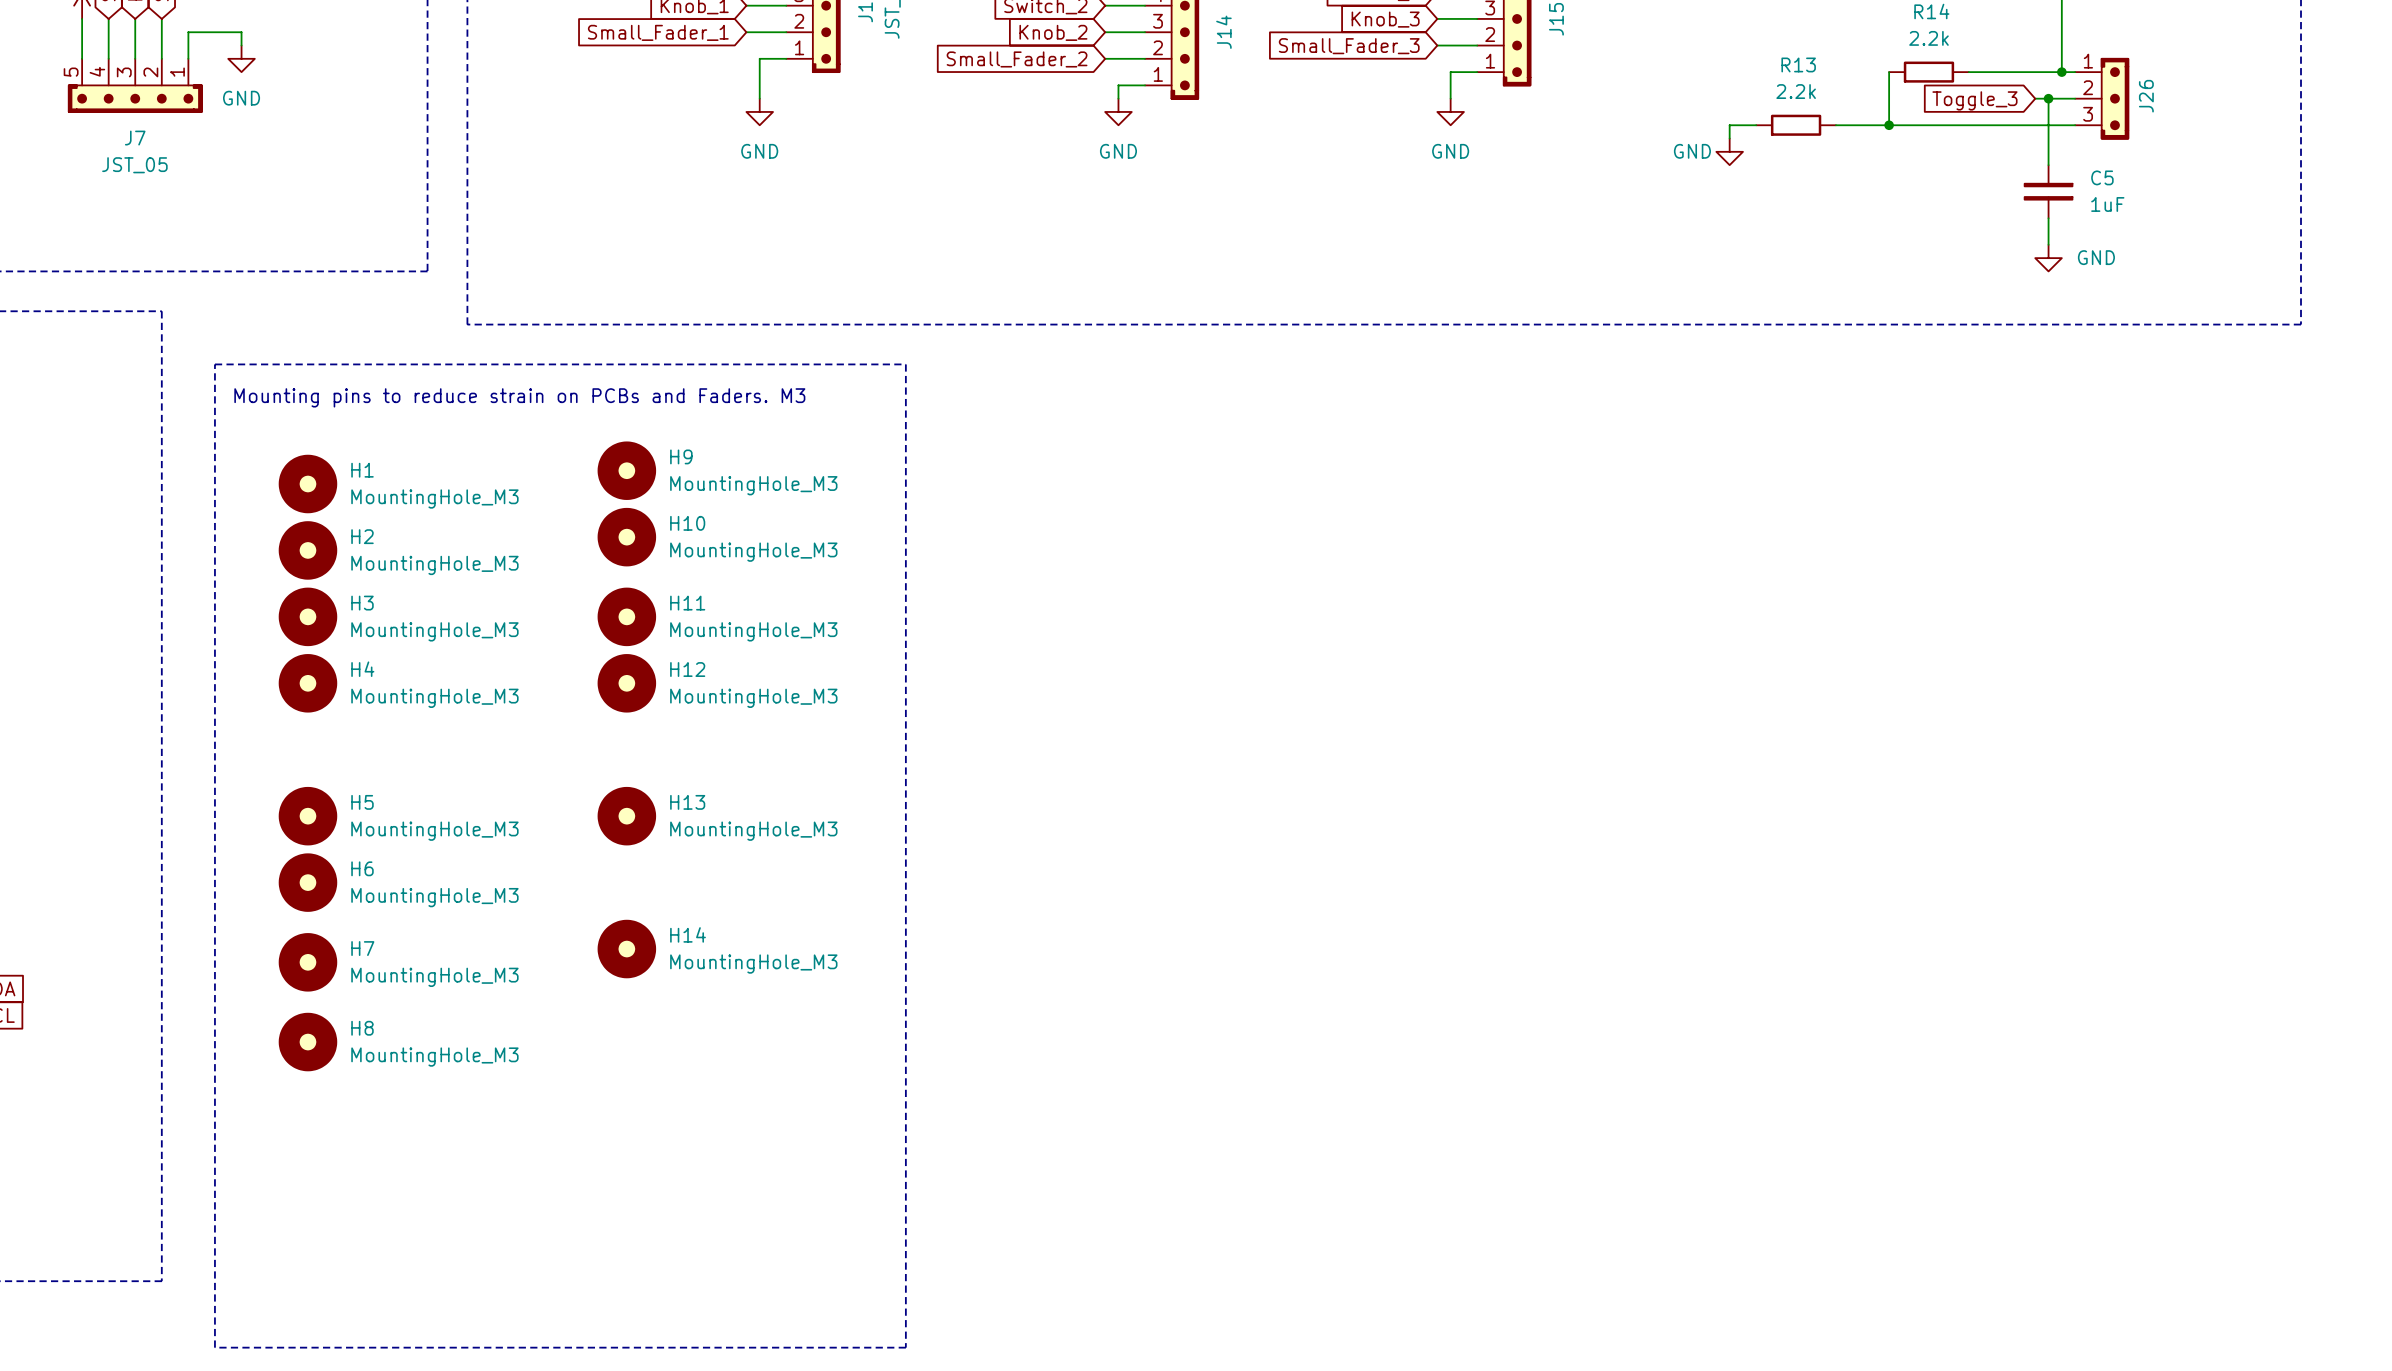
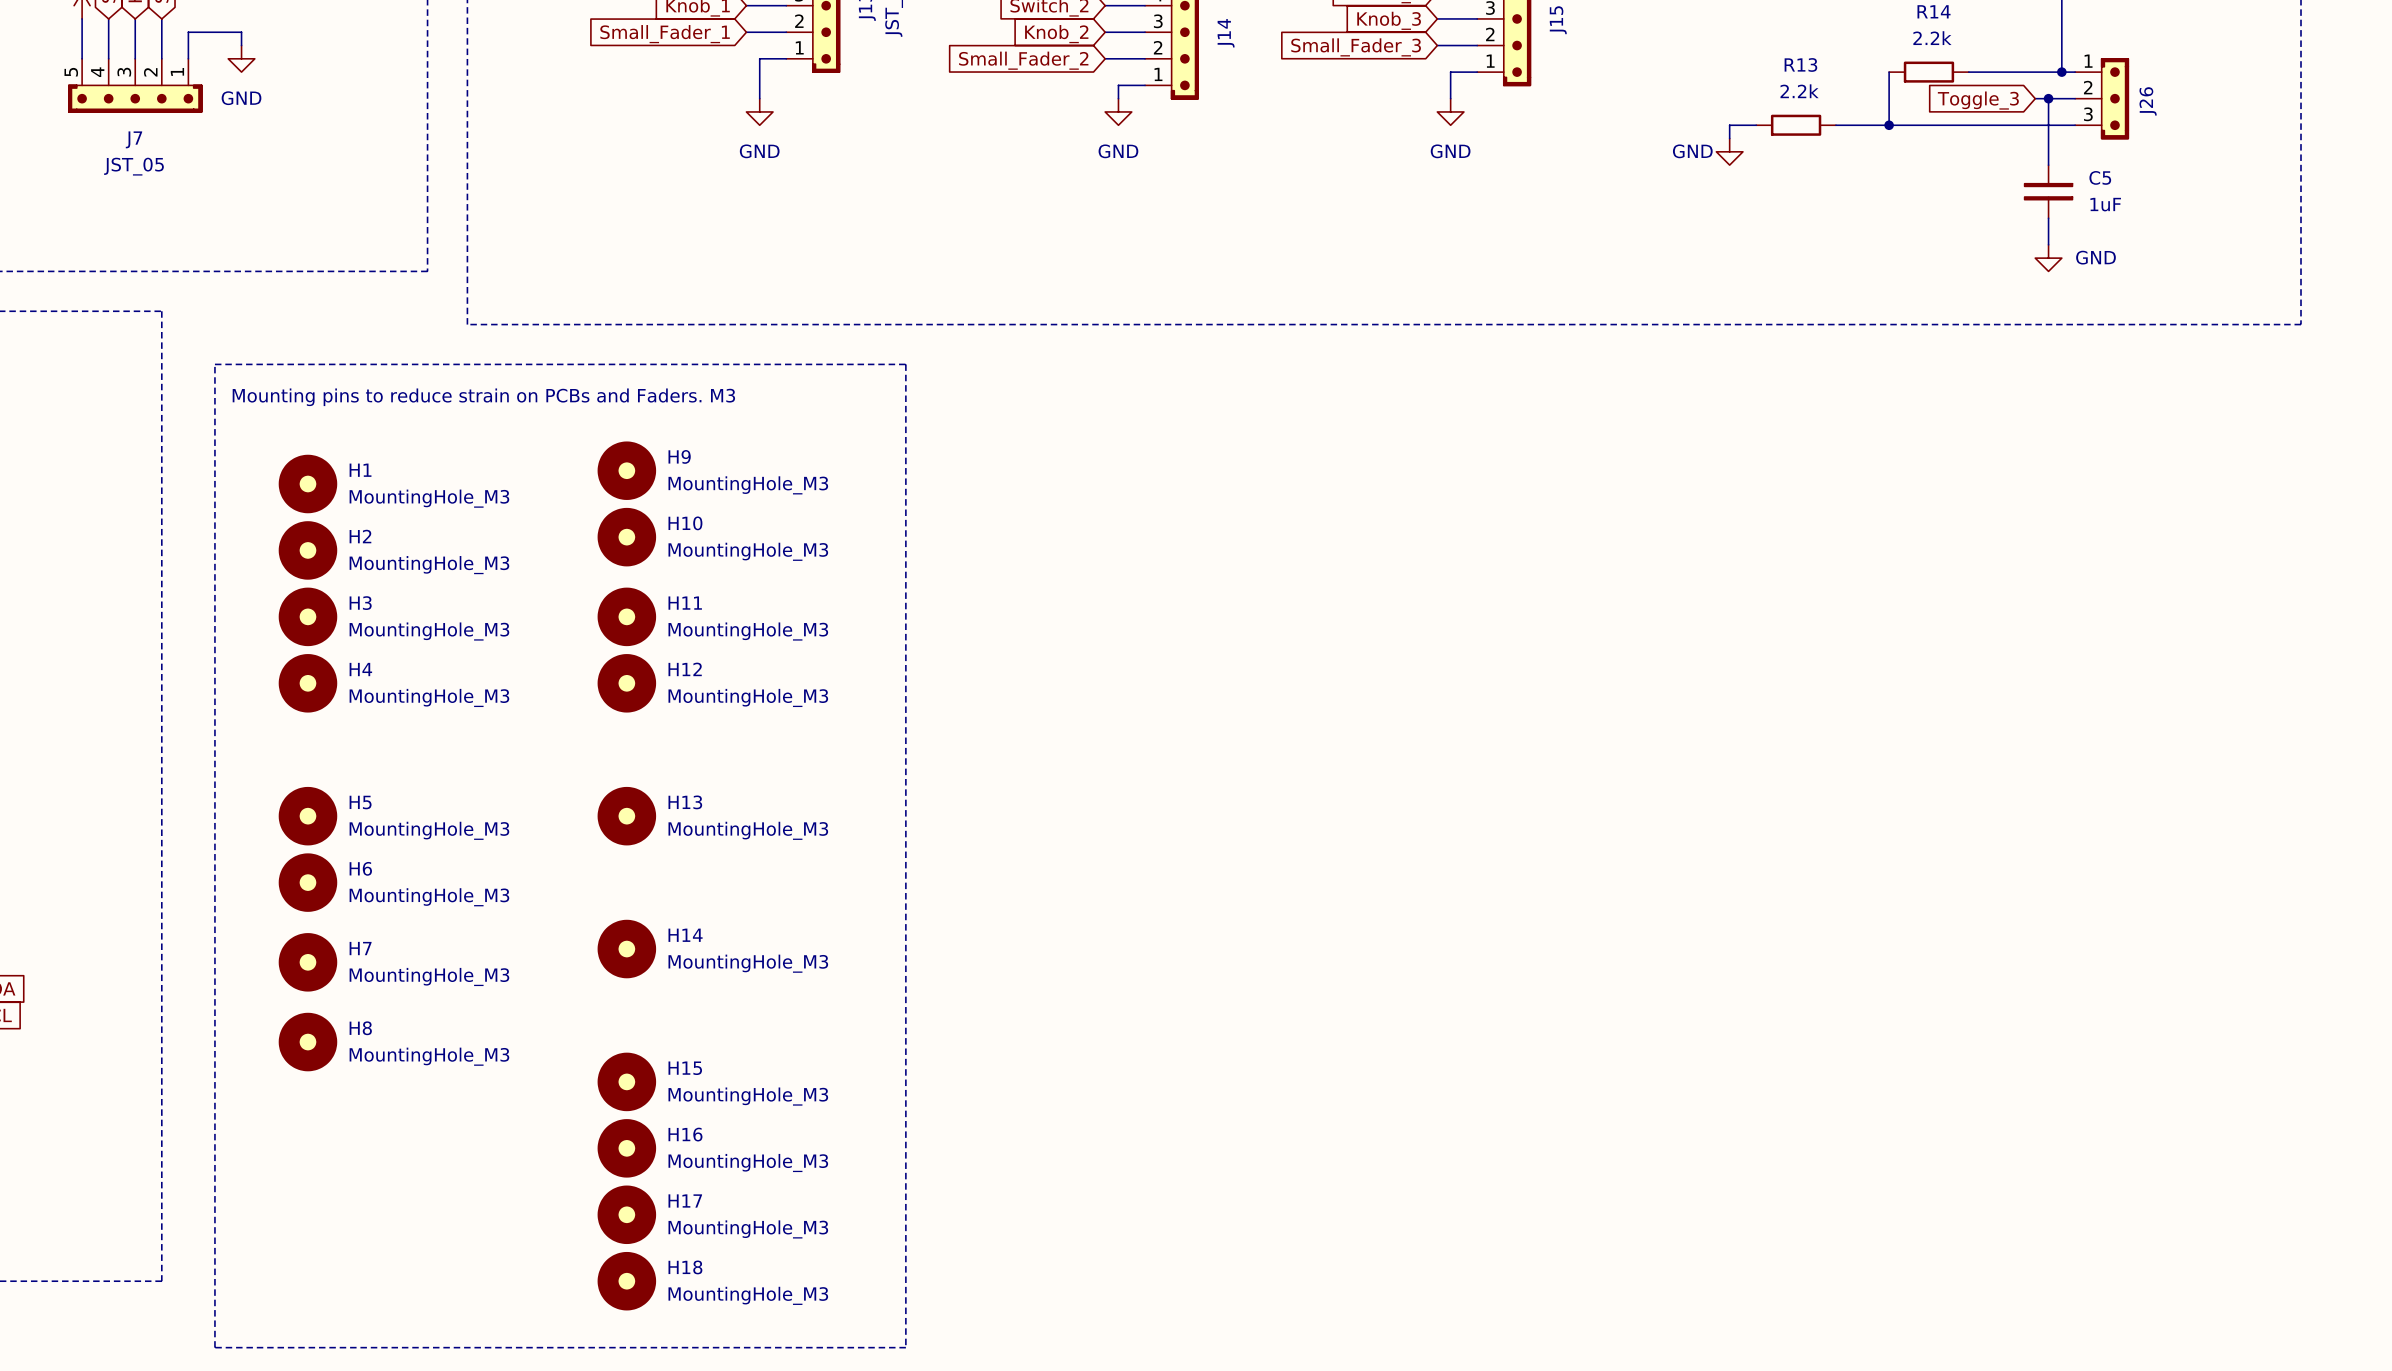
H15: none -> MountingHole_M3 (626, 1081)
H16: none -> MountingHole_M3 (626, 1148)
H17: none -> MountingHole_M3 (626, 1214)
H18: none -> MountingHole_M3 (626, 1281)

